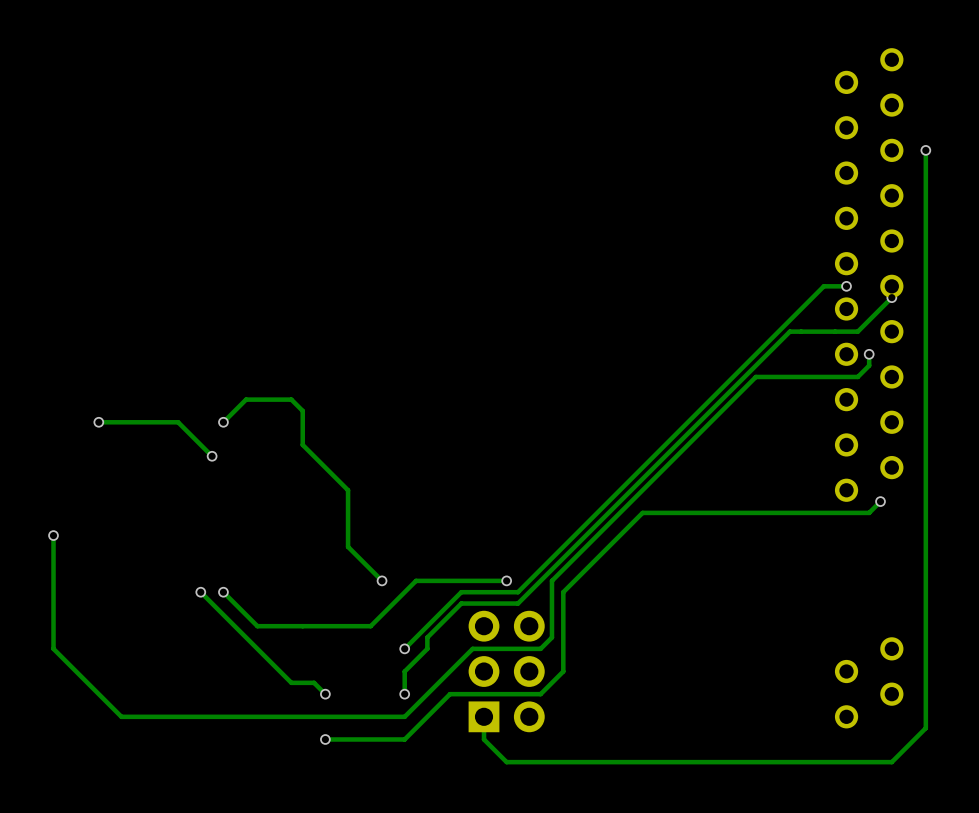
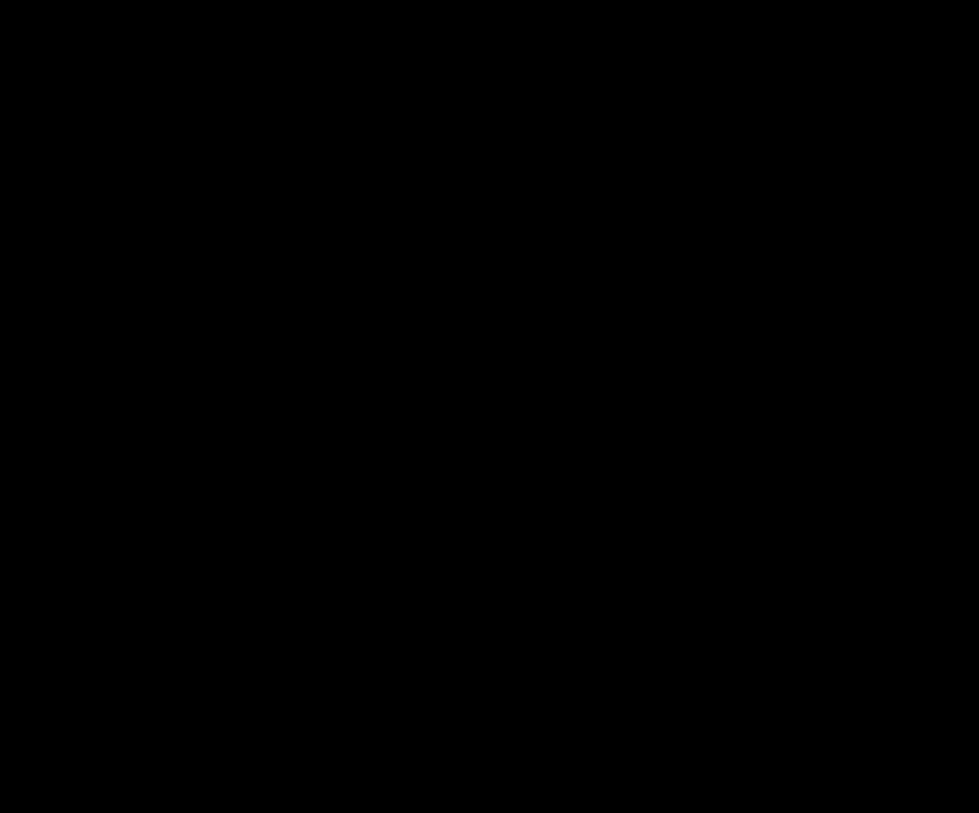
track: (925, 150) (925, 728) (891, 762) (506, 762) (484, 739) (484, 716) -> none
via: (925, 150) -> none
part: (869, 275) -> none
track: (846, 286) (823, 286) (517, 592) (461, 592) (404, 648) -> none
via: (846, 286) -> none
track: (891, 297) (857, 331) (789, 331) (517, 603) (461, 603) (427, 637) (427, 648) (404, 671) (404, 694) -> none
via: (891, 297) -> none
track: (869, 354) (869, 365) (857, 376) (755, 376) (551, 580) (551, 637) (540, 648) (472, 648) (404, 716) (121, 716) (53, 648) (53, 535) -> none
via: (869, 354) -> none
track: (98, 422) (178, 422) (212, 456) -> none
via: (98, 422) -> none
track: (223, 422) (246, 399) (291, 399) (302, 410) (302, 444) (348, 490) (348, 546) (382, 580) -> none
via: (223, 422) -> none
via: (212, 456) -> none
track: (880, 501) (869, 512) (642, 512) (563, 592) (563, 671) (540, 694) (450, 694) (404, 739) (325, 739) -> none
via: (880, 501) -> none
via: (53, 535) -> none
via: (382, 580) -> none
track: (506, 580) (416, 580) (370, 626) (257, 626) (223, 592) -> none
via: (506, 580) -> none
track: (200, 592) (291, 682) (314, 682) (325, 694) -> none
via: (200, 592) -> none
via: (223, 592) -> none
via: (404, 648) -> none
part: (506, 671) -> none
part: (869, 682) -> none
via: (325, 694) -> none
via: (404, 694) -> none
via: (325, 739) -> none

